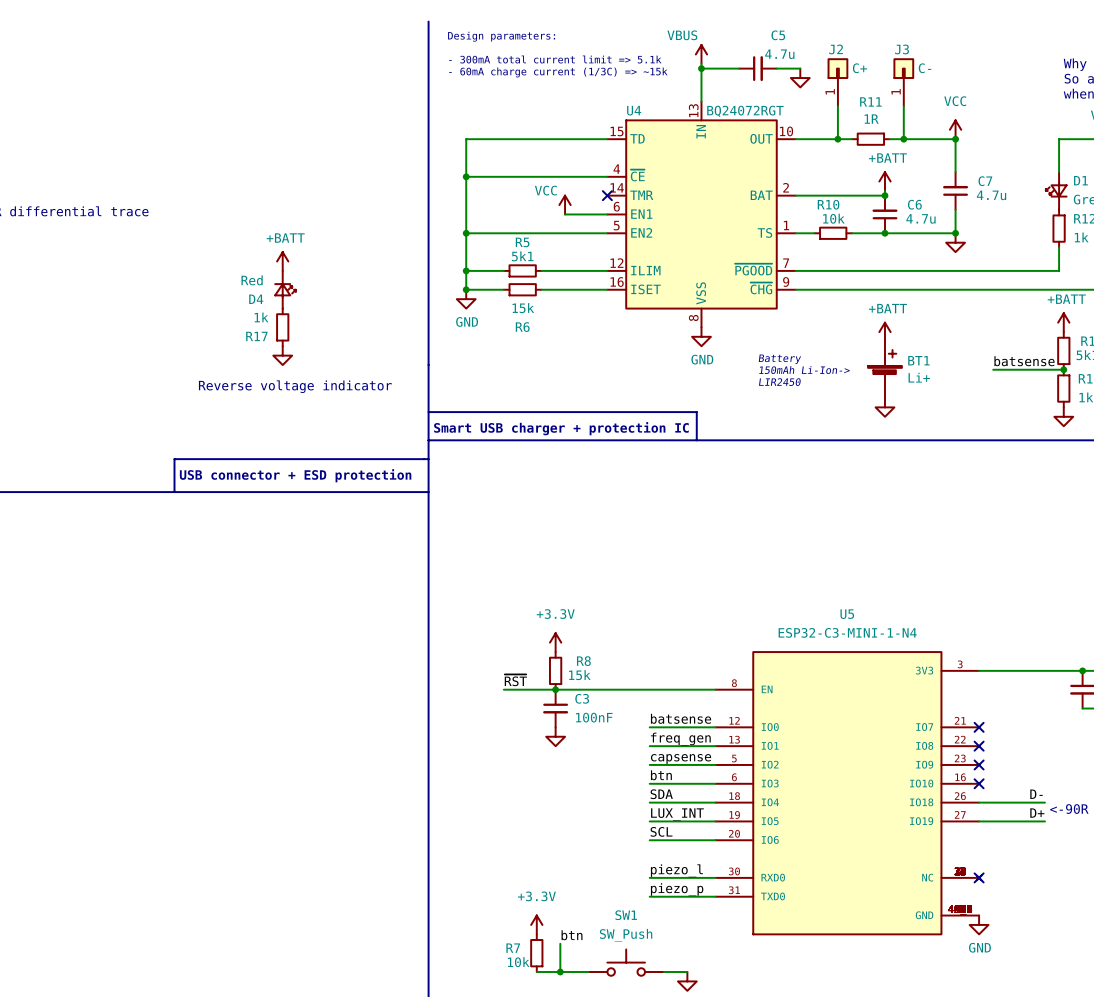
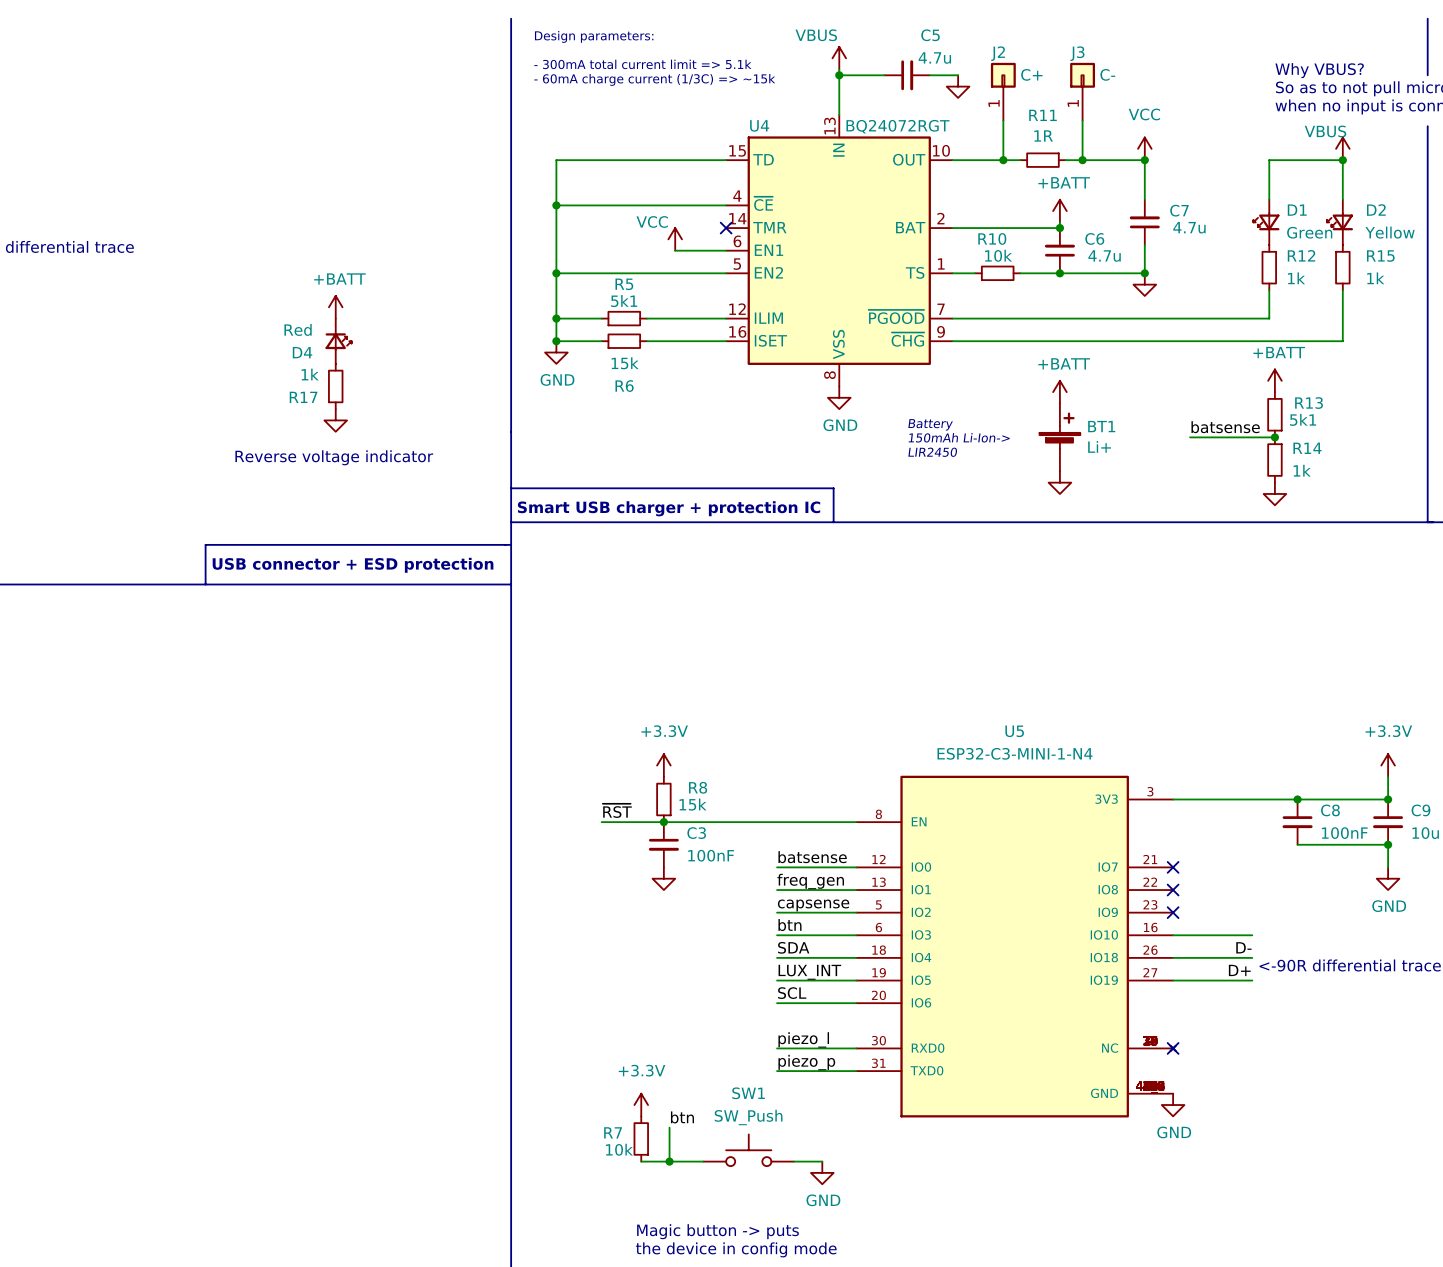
wire: none -> (1173, 935) (1252, 935)
no-connect mark: (979, 783) -> none

